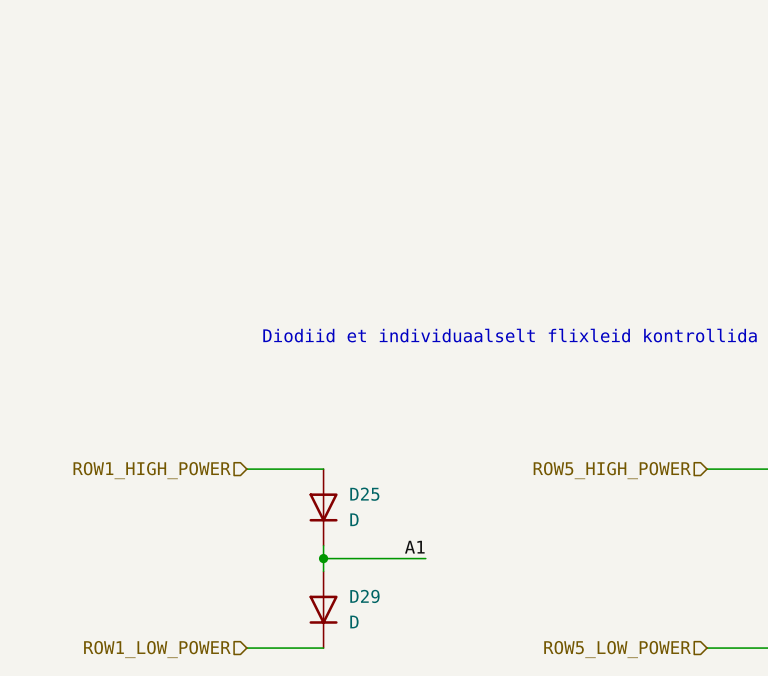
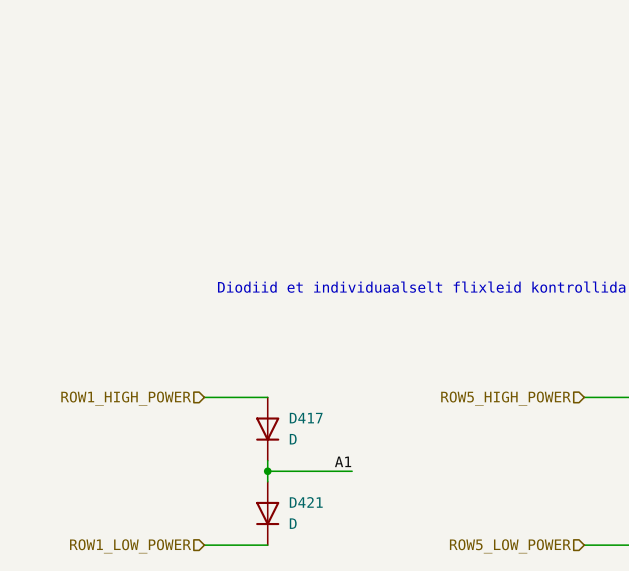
D25 name: D25 (364, 494) -> D417 (306, 418)
D29 name: D29 (364, 596) -> D421 (306, 502)

